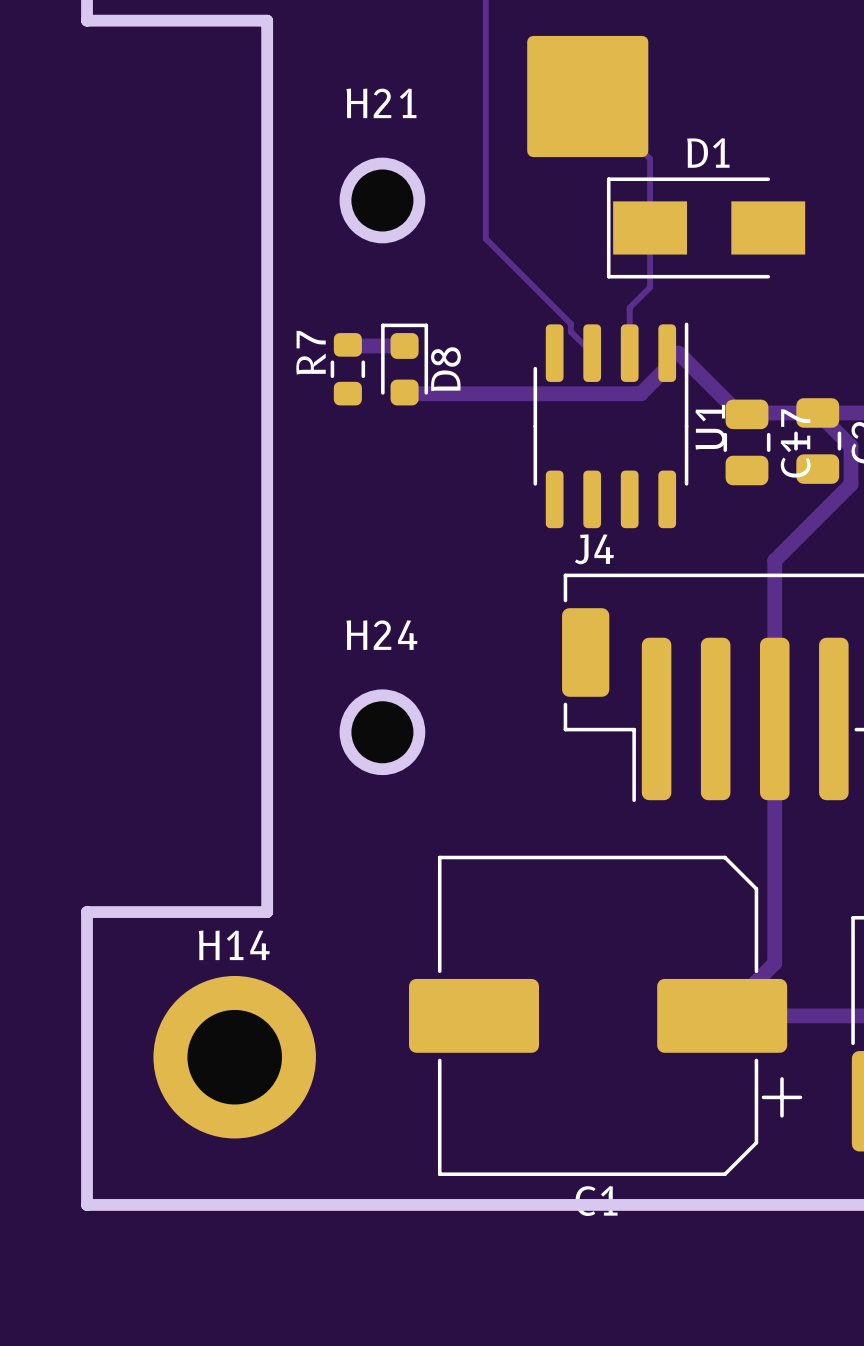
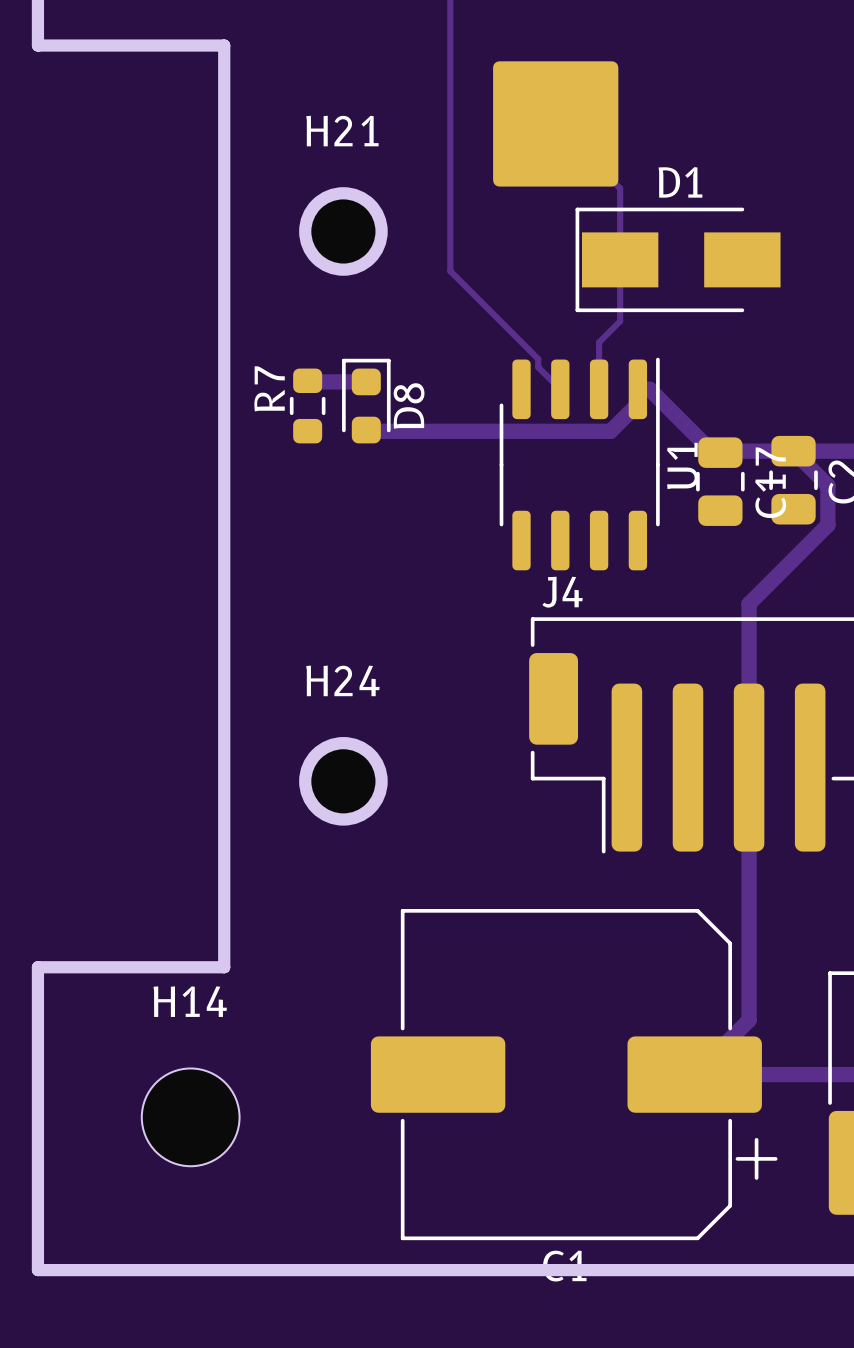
H14 footprint: [153, 975, 316, 1139] -> [141, 1068, 240, 1167]

